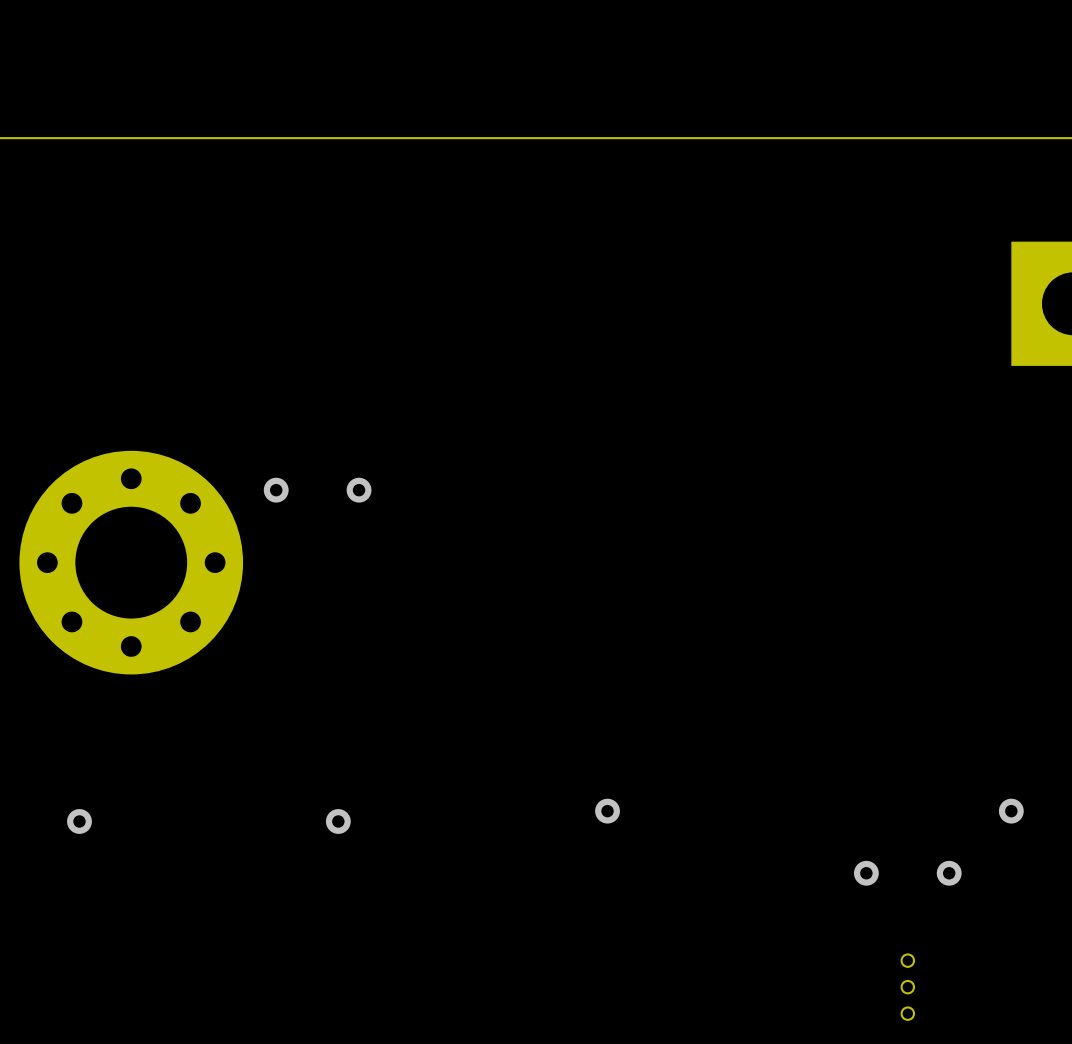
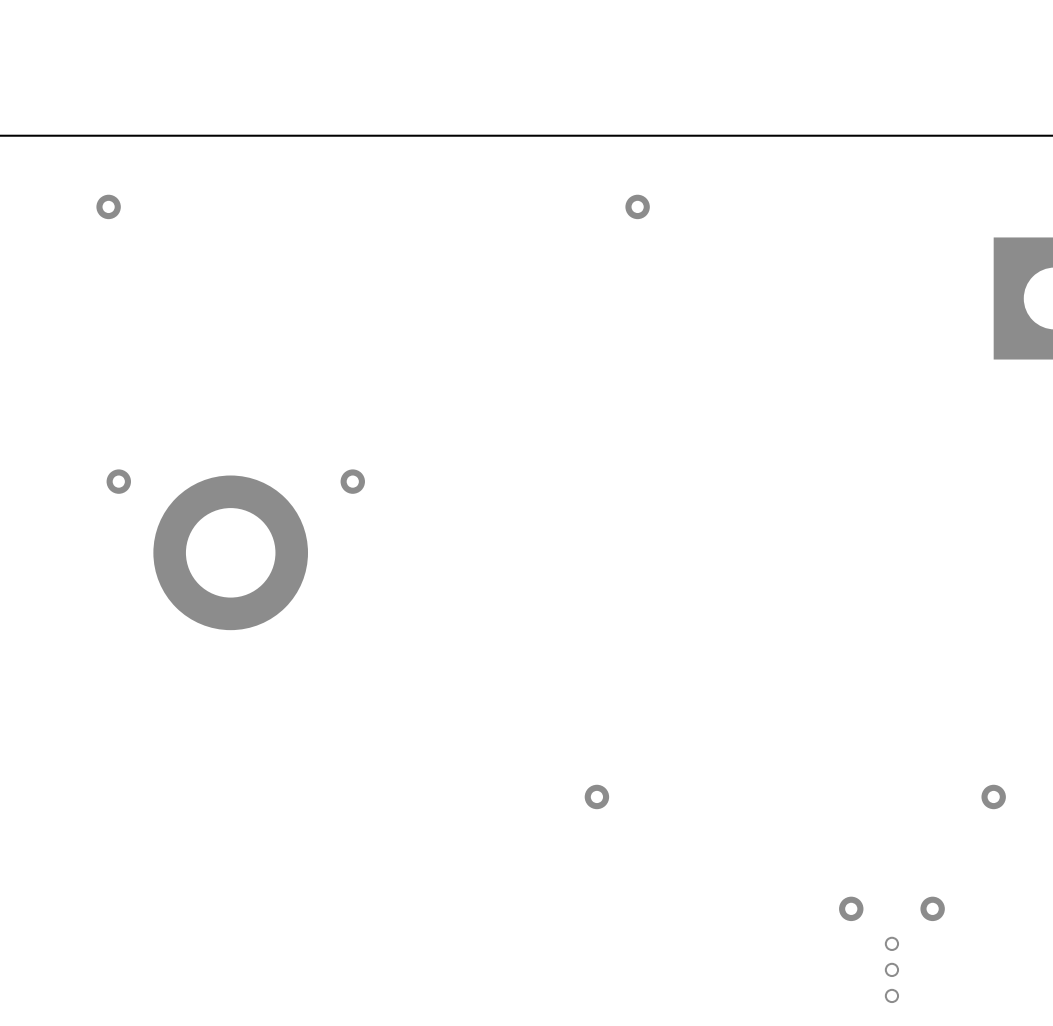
via: none -> (108, 206)
via: none -> (637, 206)
via position: (276, 490) -> (118, 481)
part: (131, 562) -> none
part: none -> (230, 552)
via: (79, 821) -> none
via: (338, 821) -> none
via: (866, 873) -> none
via: (949, 873) -> none
via: none -> (851, 908)
via: none -> (932, 908)

